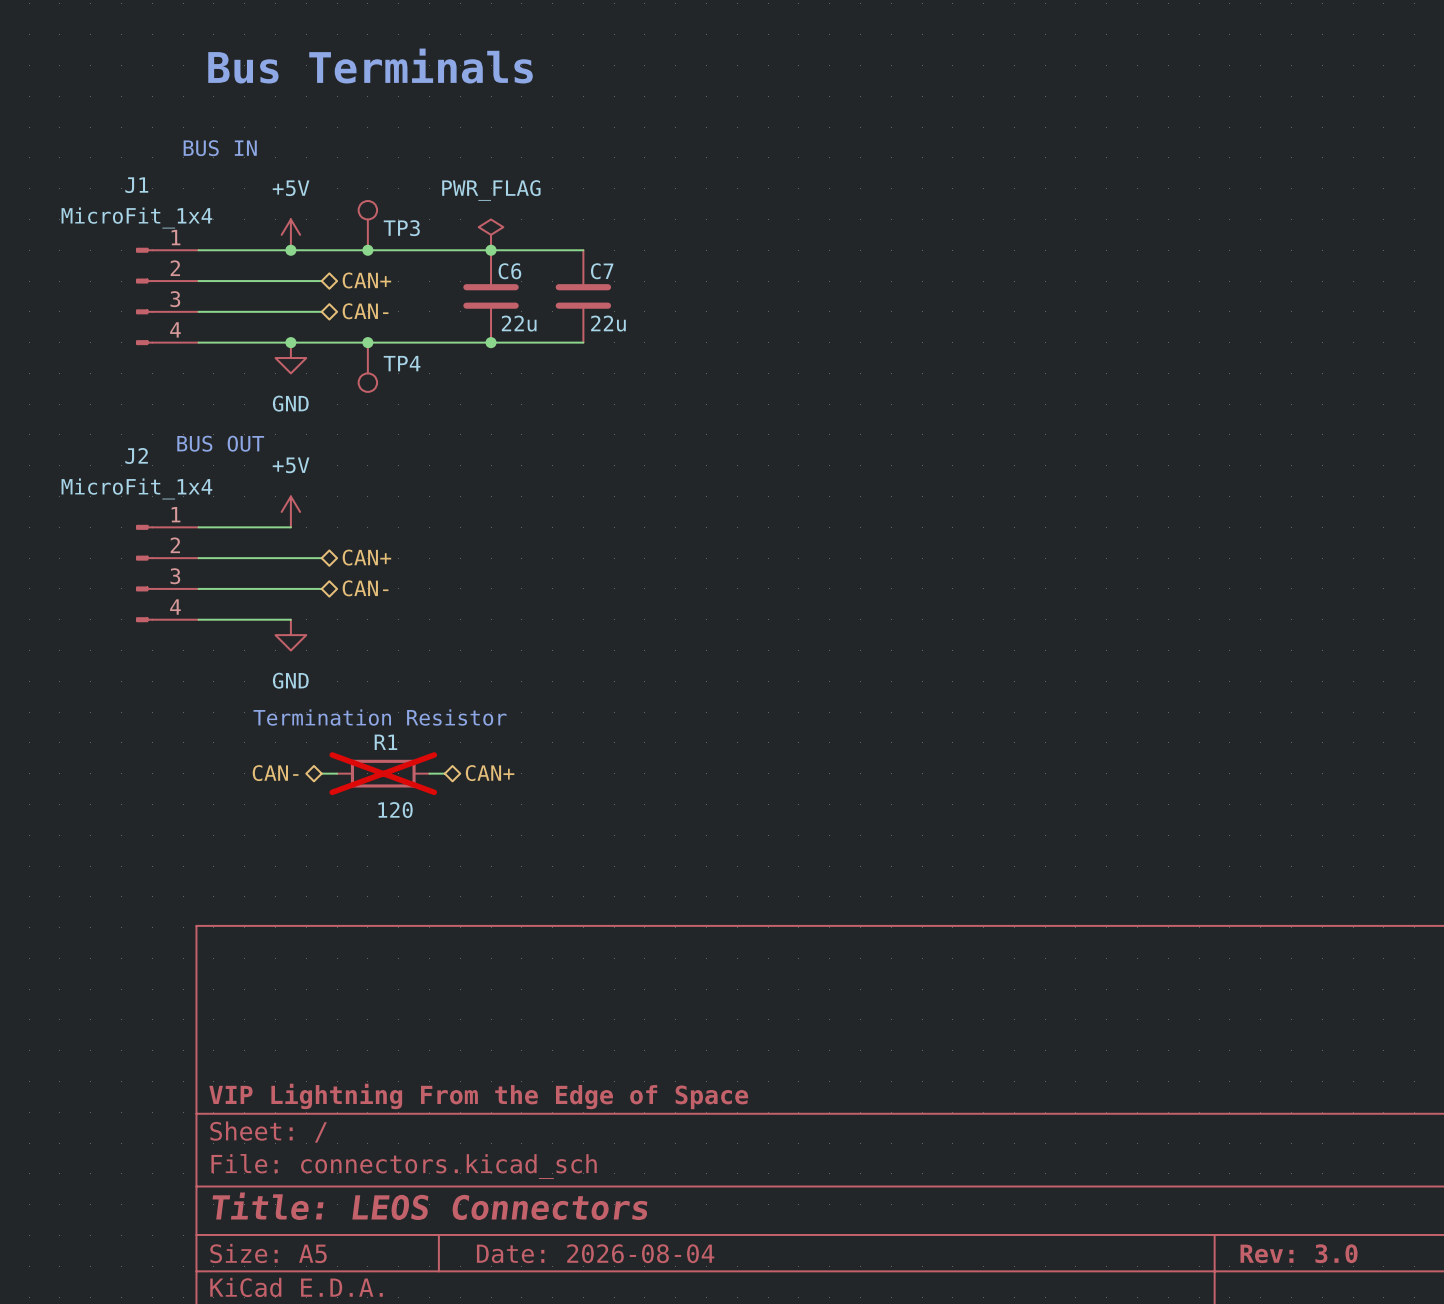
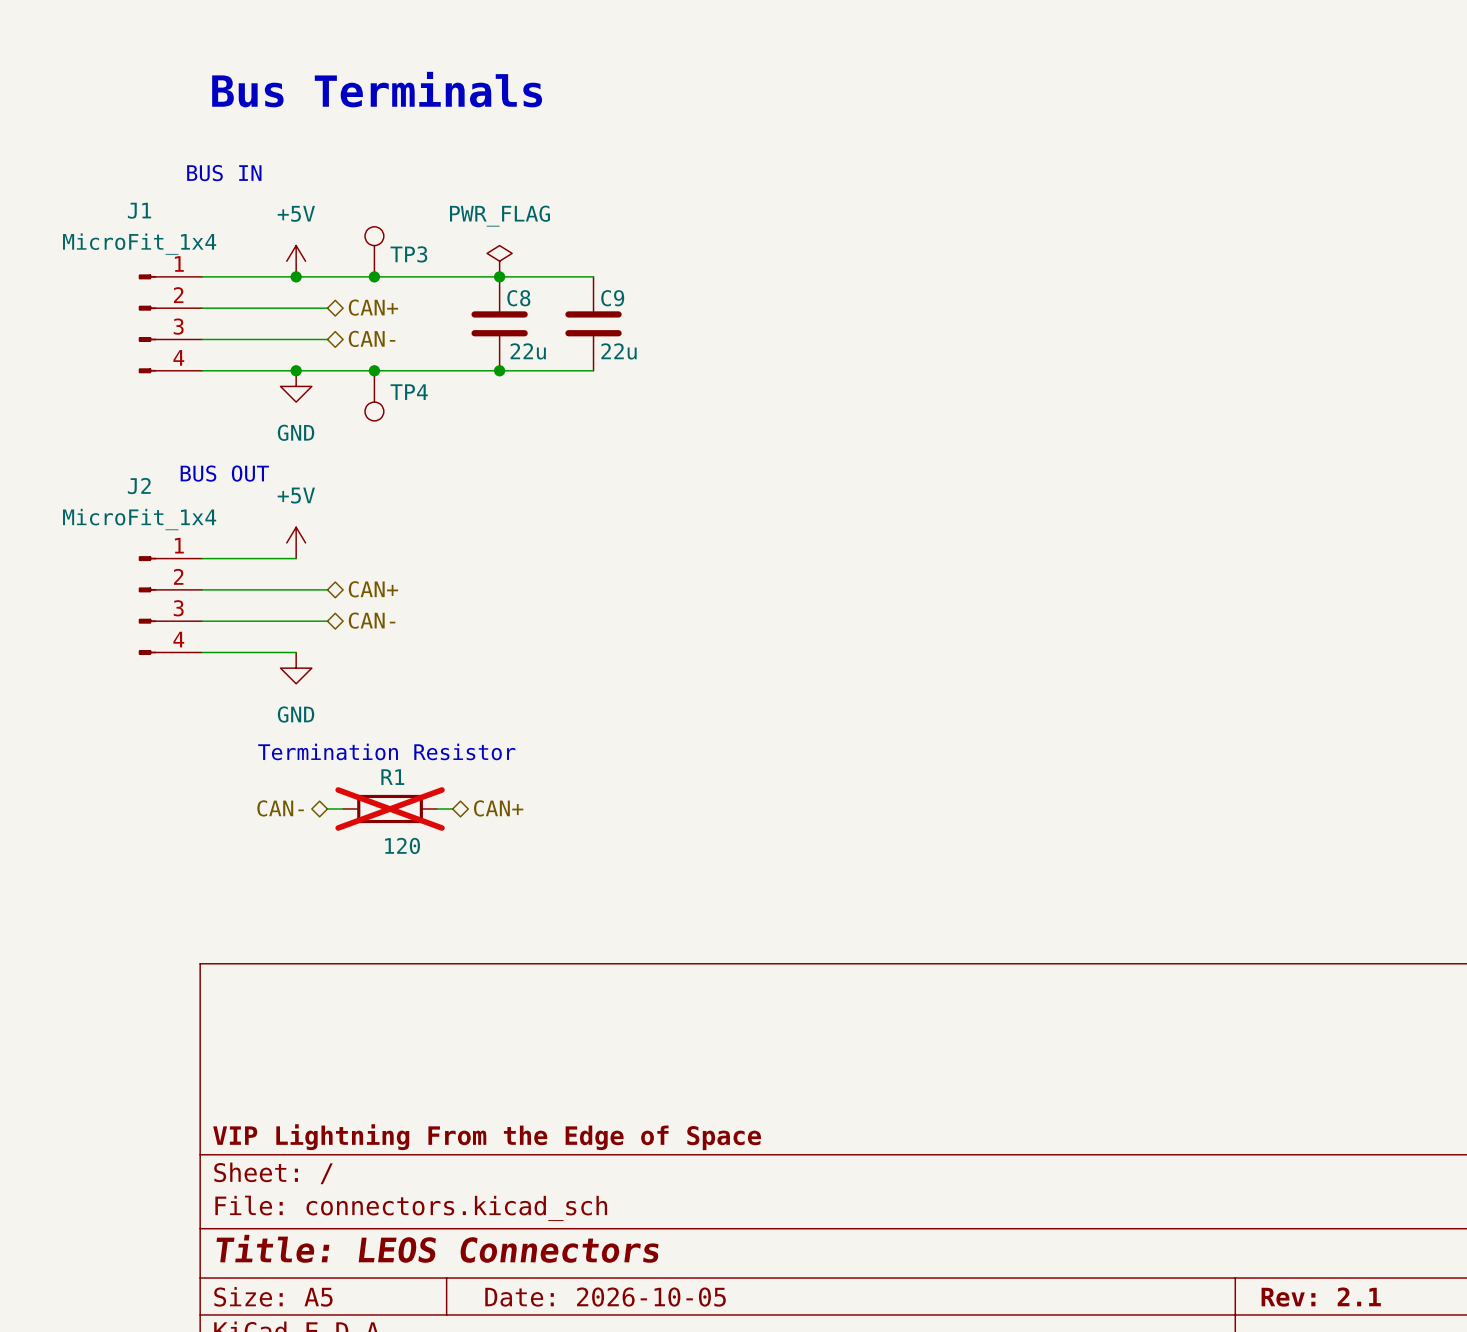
C6 name: C6 (509, 271) -> C8 (518, 298)
C7 name: C7 (602, 271) -> C9 (612, 298)
title block: Date: 2026-08-04 (595, 1253) -> Date: 2026-10-05 (605, 1297)
title block: Rev: 3.0 (1299, 1253) -> Rev: 2.1 (1321, 1297)

